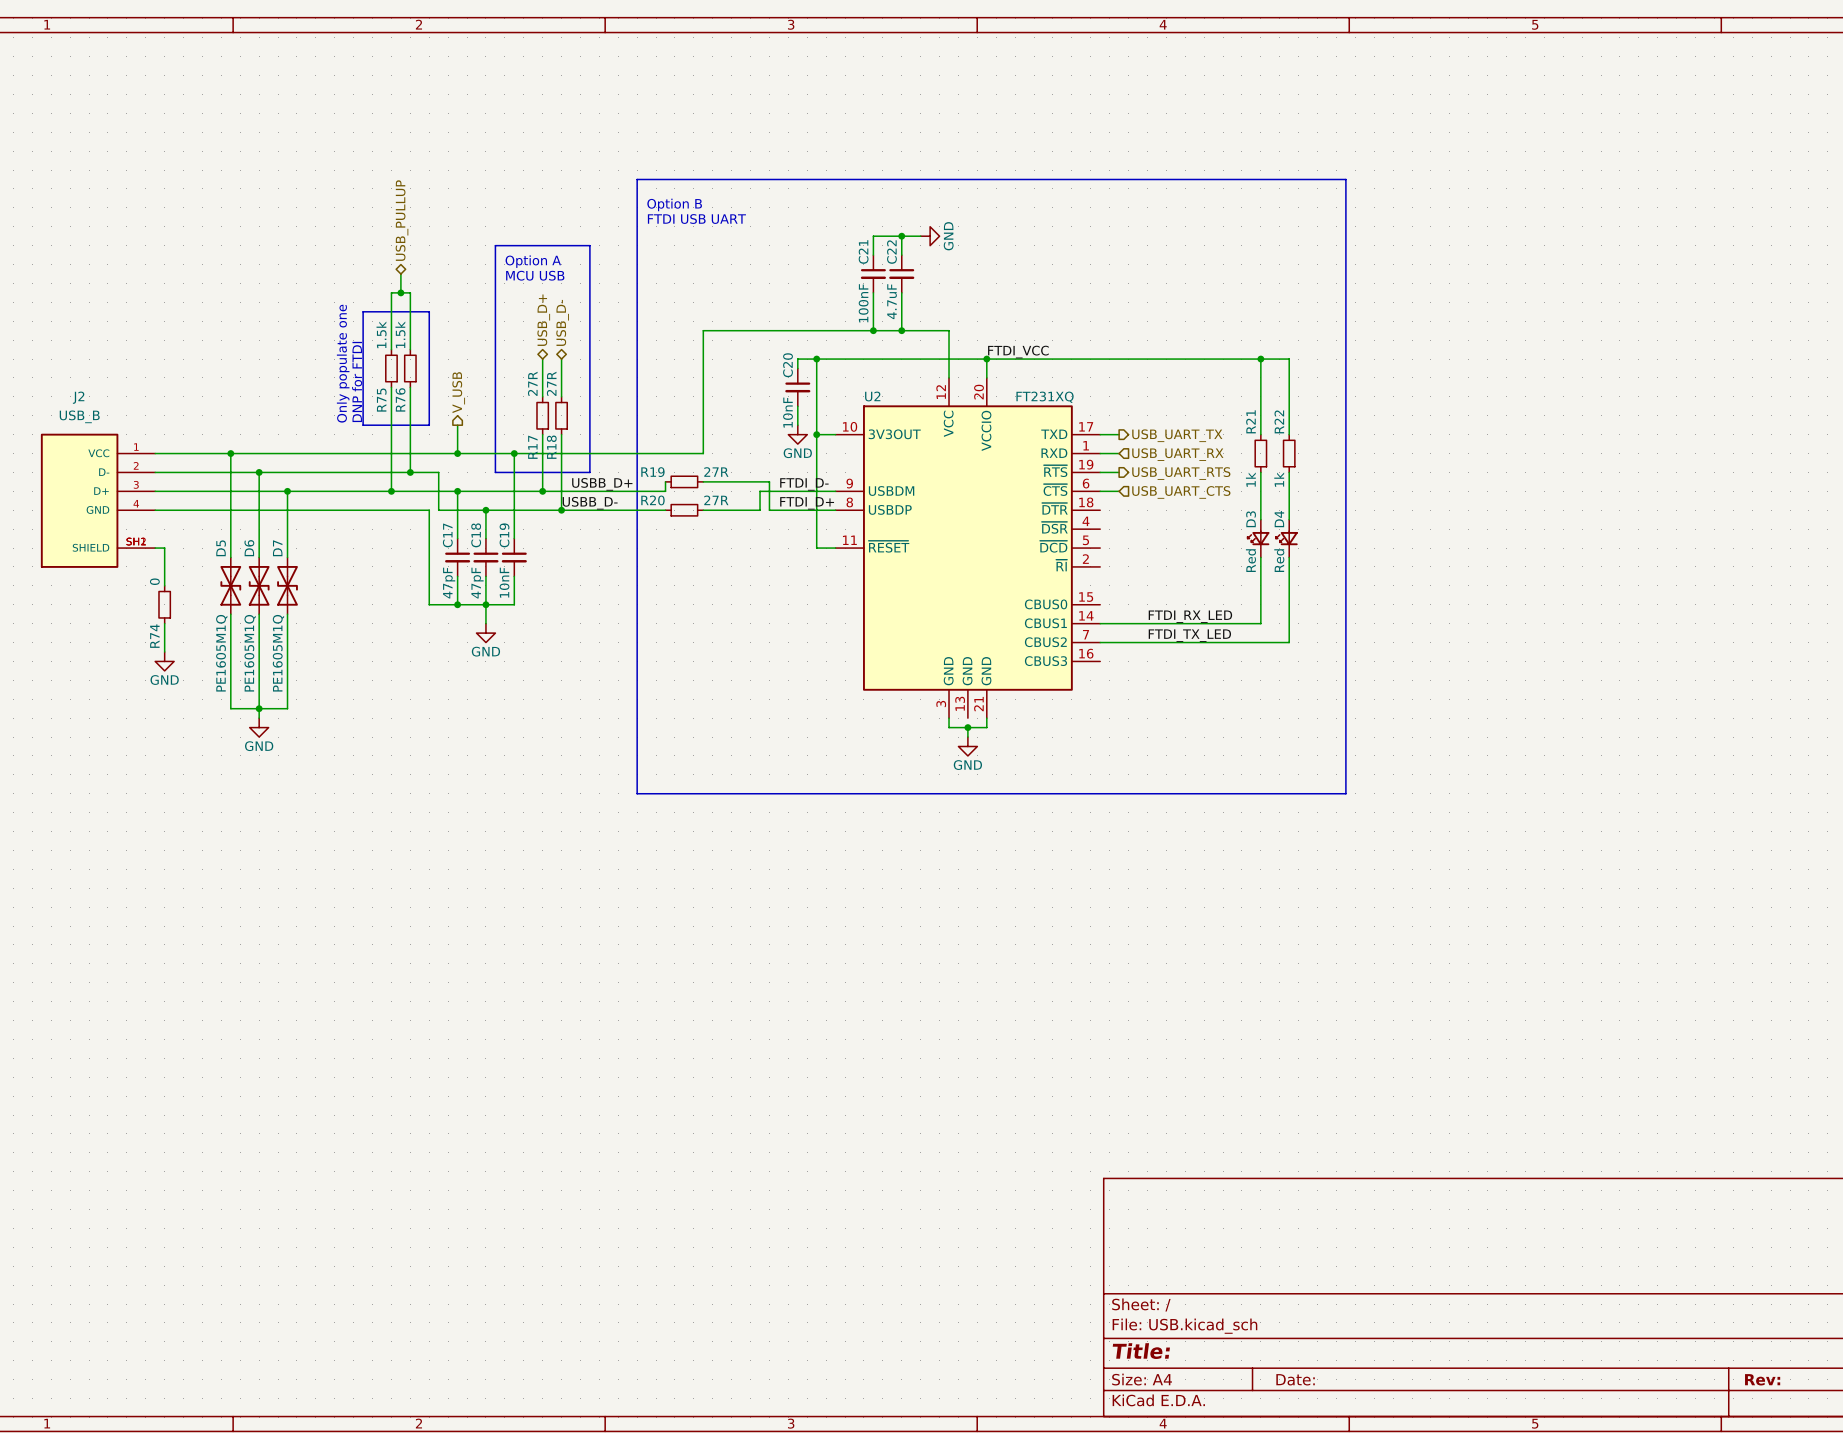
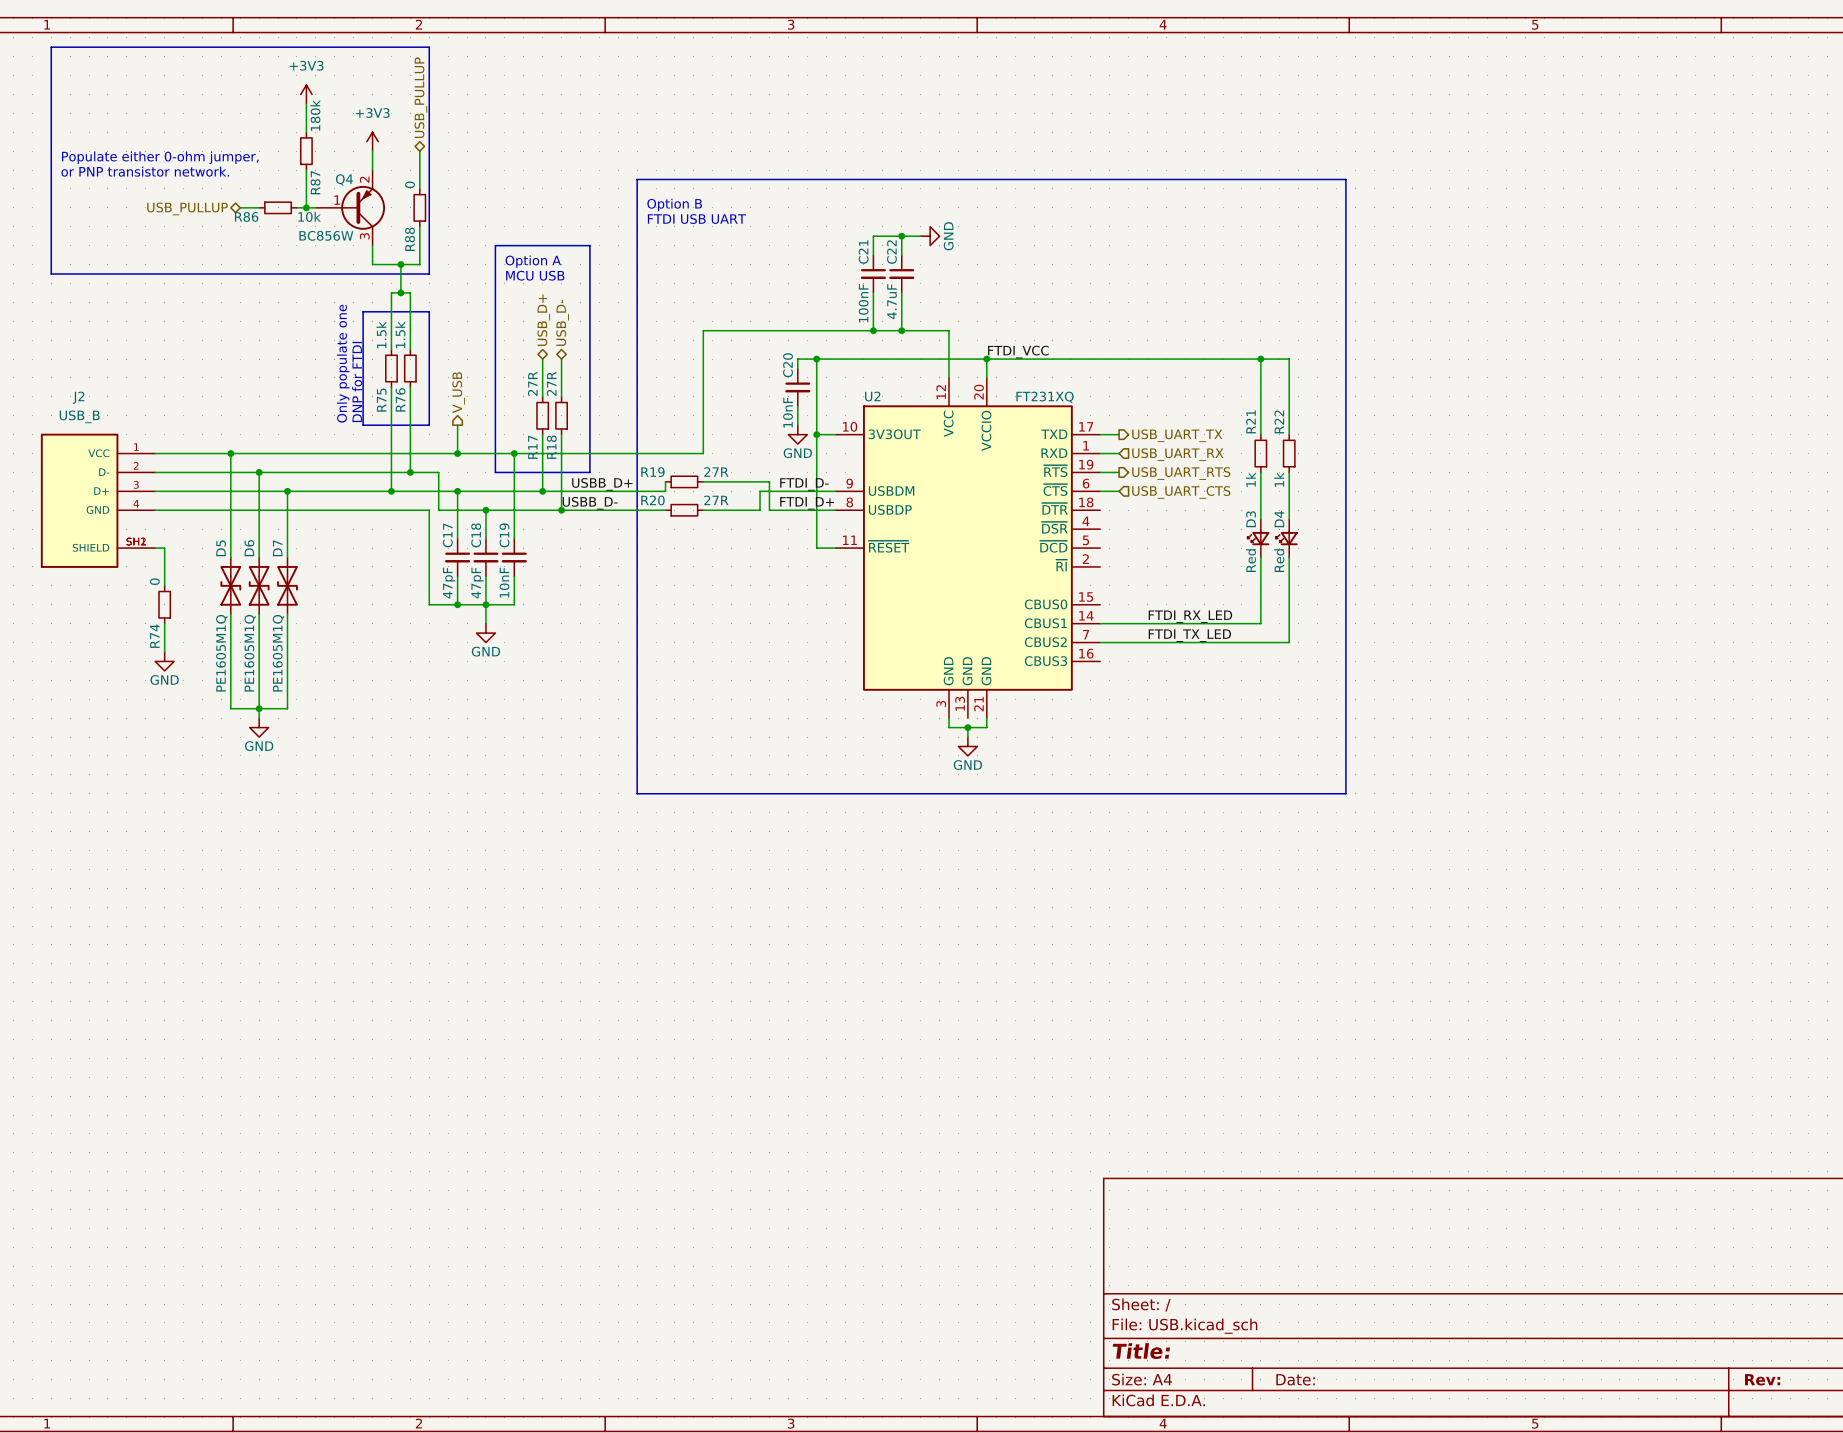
line: none -> (51, 47) (429, 47) (429, 274) (51, 274) (51, 47)
power symbol: none -> +3V3 (306, 94)
hierarchical label: none -> USB_PULLUP (420, 97)
wire: none -> (306, 103) (306, 132)
power symbol: none -> +3V3 (372, 141)
R87: none -> 180k (306, 151)
wire: none -> (372, 151) (372, 170)
wire: none -> (419, 151) (419, 188)
text: none -> Populate either 0-ohm jumper, (160, 157)
wire: none -> (306, 170) (306, 207)
text: none -> or PNP transistor network. (145, 171)
wire: none -> (240, 207) (259, 207)
R86: none -> 10k (278, 207)
wire: none -> (296, 207) (315, 207)
junction: none -> (306, 207)
Q4: none -> BC856W (350, 207)
R88: none -> 0 (419, 207)
hierarchical label: none -> USB_PULLUP (187, 208)
hierarchical label: USB_PULLUP (402, 220) -> none
wire: none -> (419, 226) (419, 264) (372, 264) (372, 245)
wire: none -> (400, 264) (400, 274)
junction: none -> (400, 264)

